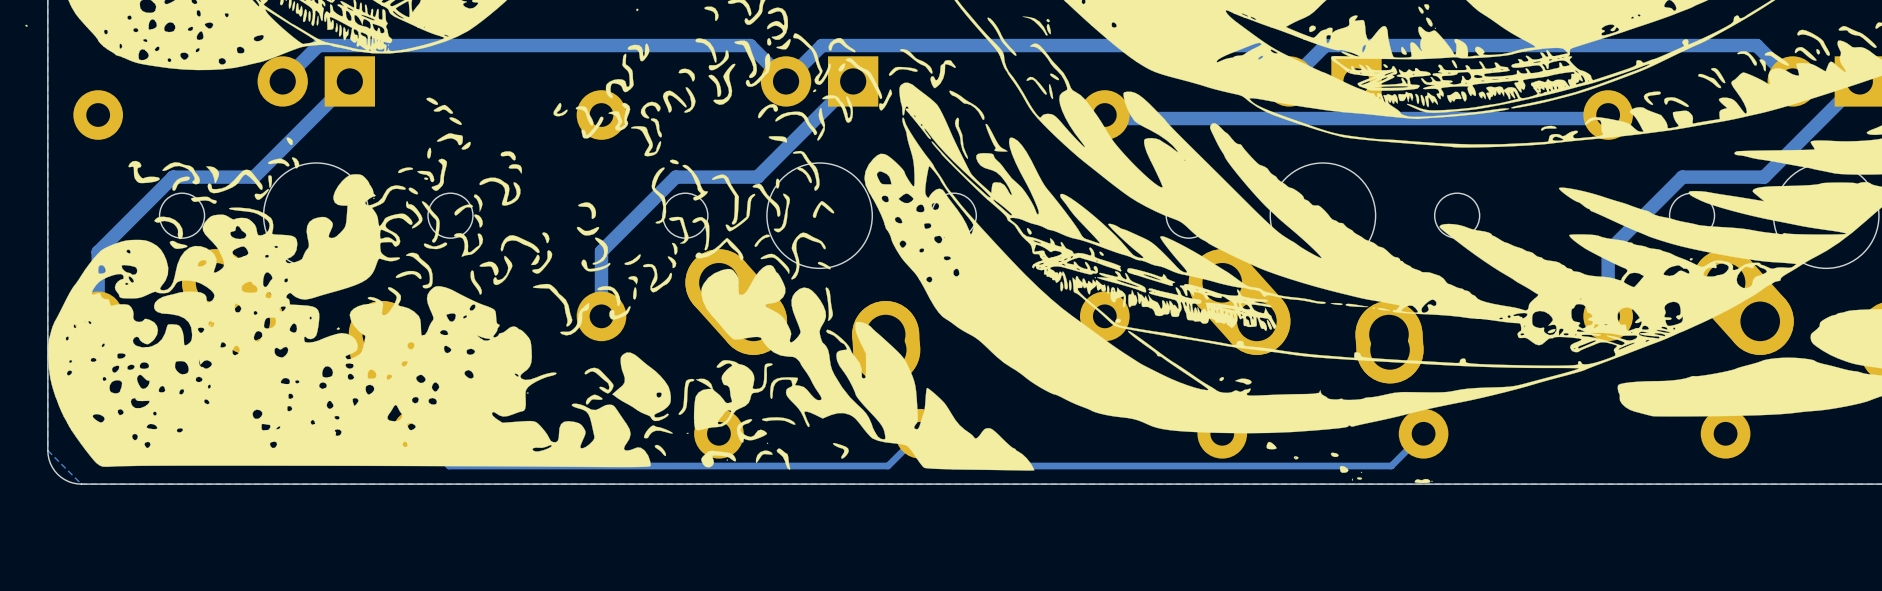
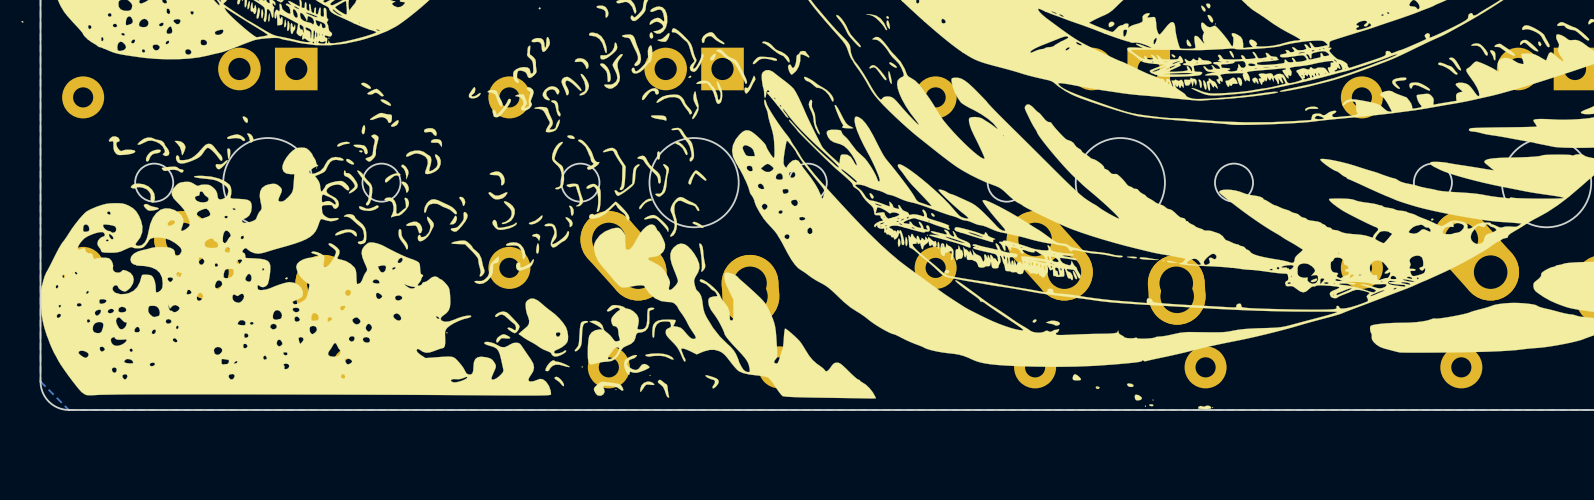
track: (349, 81) (254, 177) (173, 177) (98, 252) (98, 316) -> none
track: (853, 81) (757, 177) (675, 177) (601, 251) (601, 316) -> none
track: (1792, 81) (1756, 45) (1325, 45) (1289, 81) (1253, 45) (821, 45) (786, 81) (750, 45) (318, 45) (282, 81) -> none
track: (1859, 81) (1764, 177) (1682, 177) (1608, 251) (1608, 316) -> none
track: (1608, 115) (1604, 118) (1108, 118) (1104, 115) -> none
track: (1423, 433) (1391, 466) (952, 466) (920, 433) (888, 466) (449, 466) (416, 433) -> none

